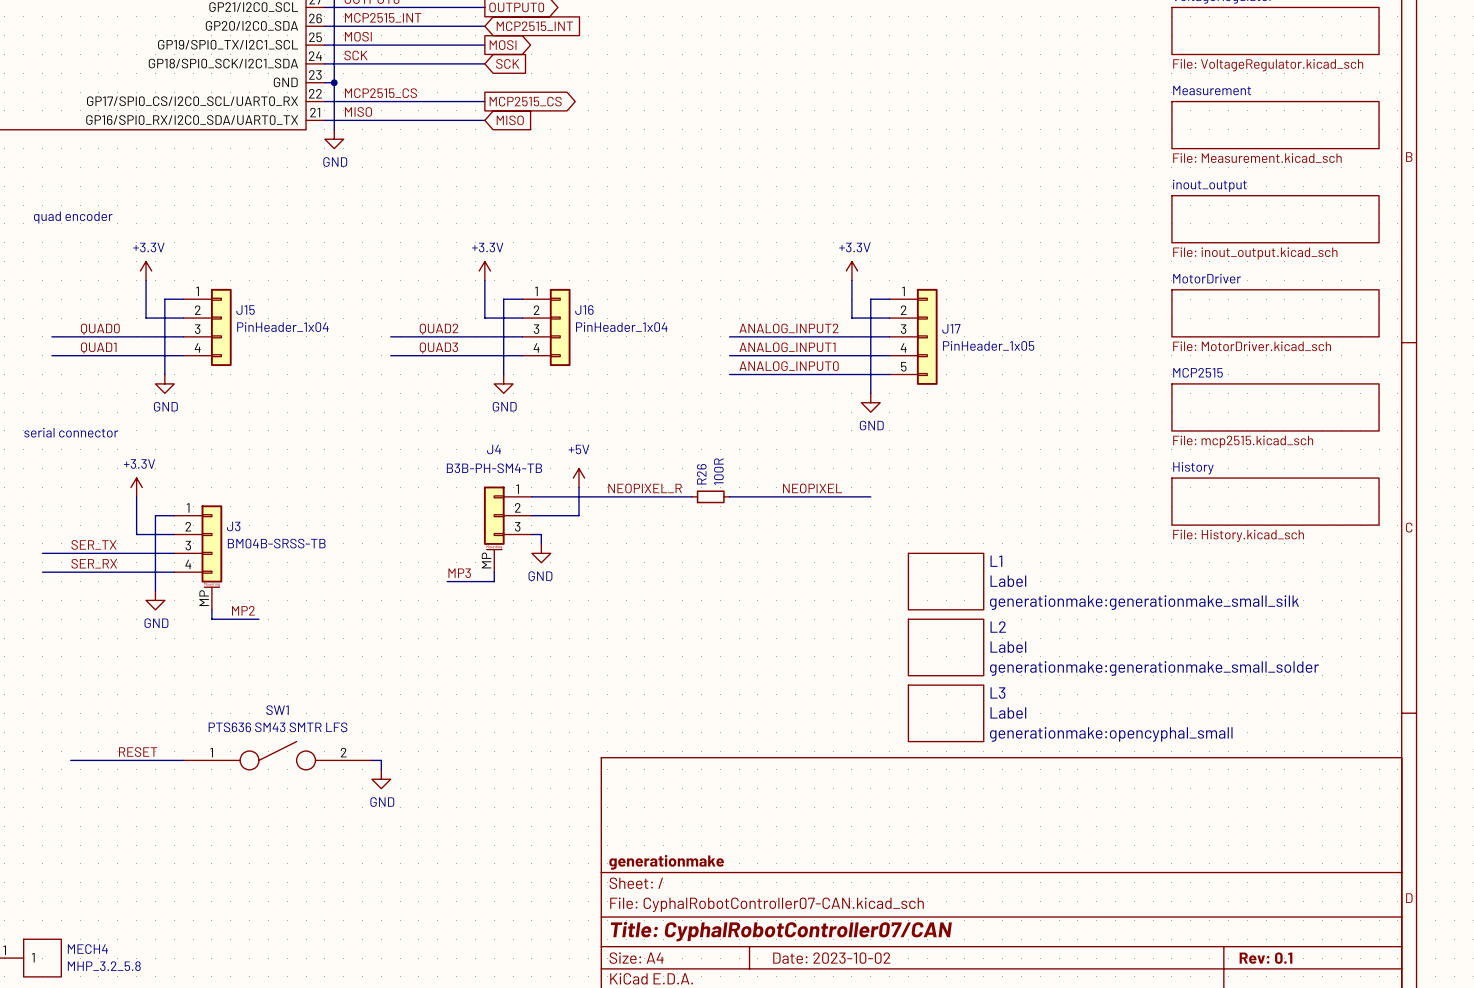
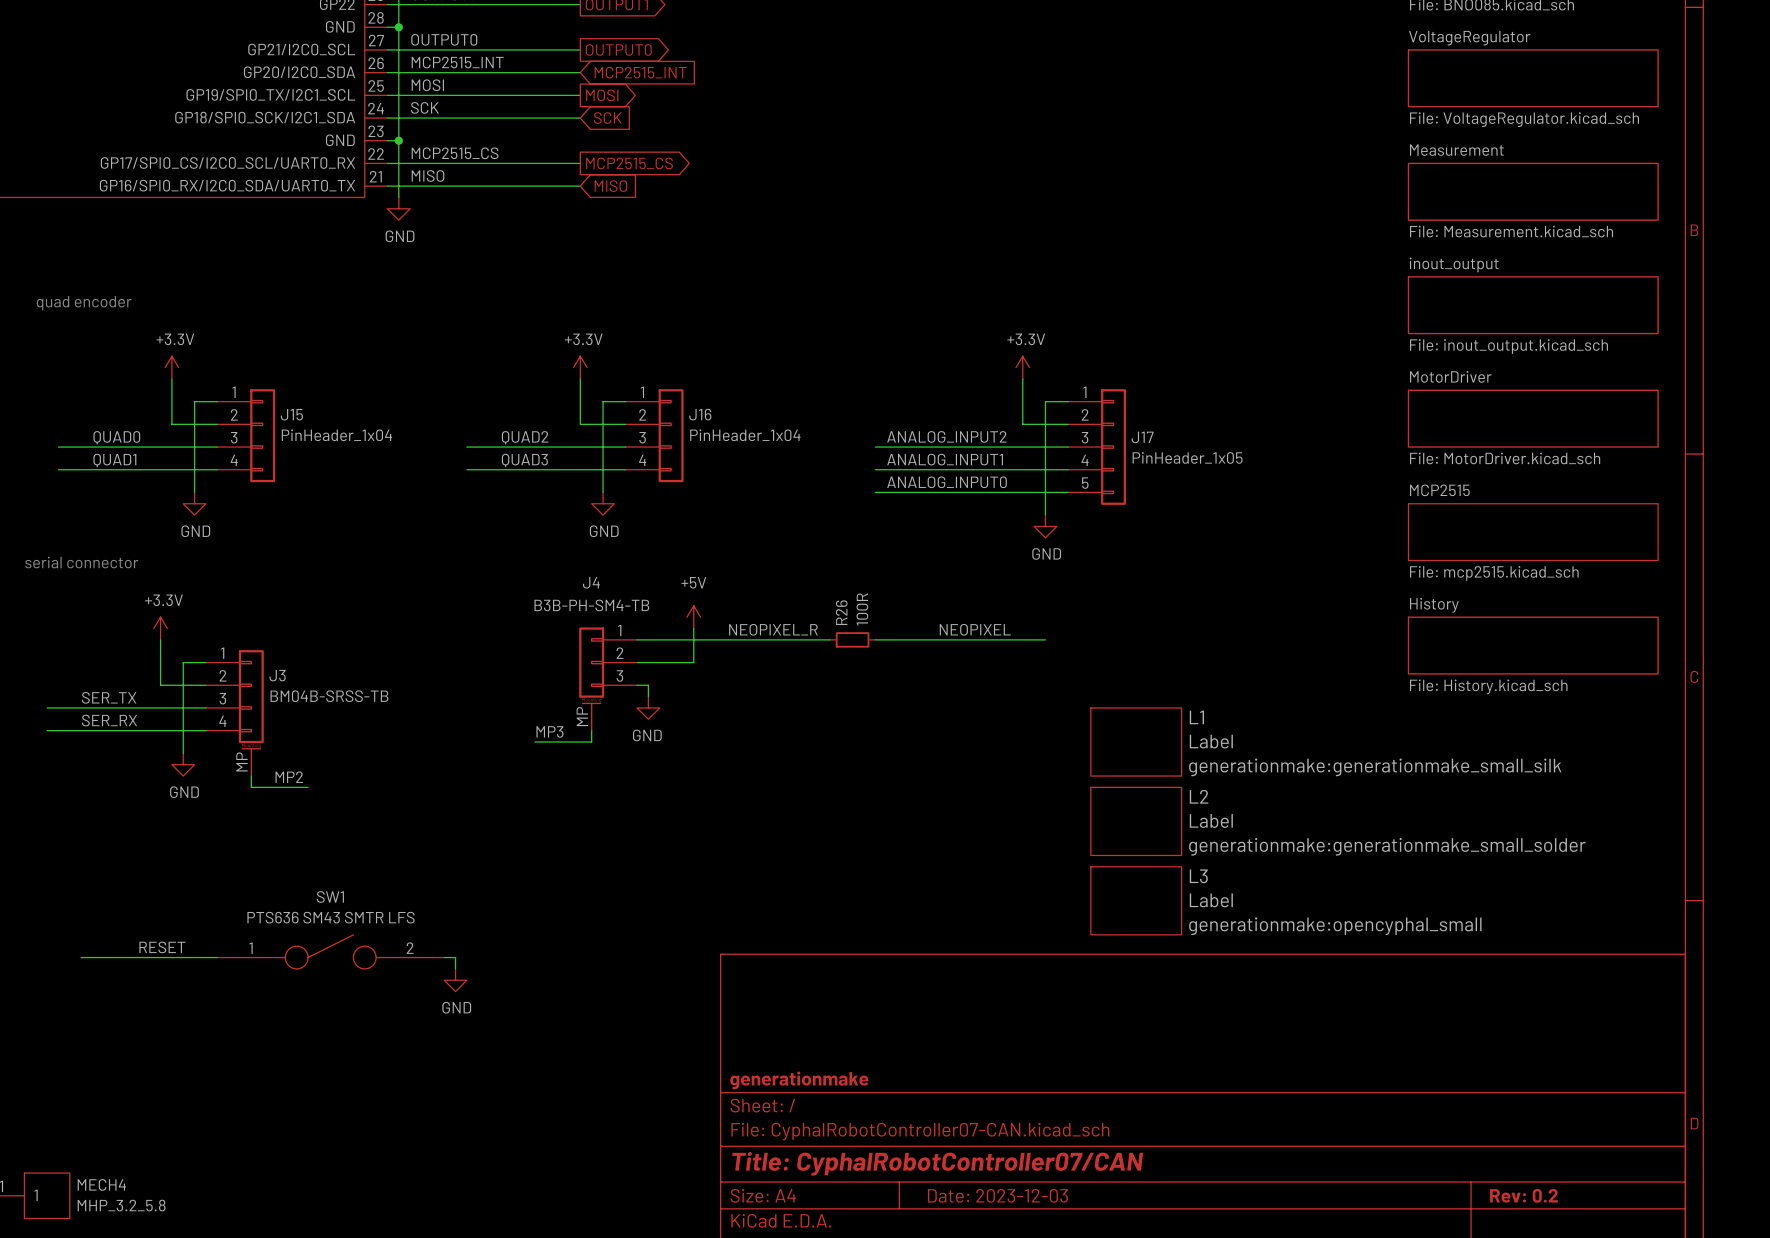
title block: Date: 2023-10-02 (831, 958) -> Date: 2023-12-03 (997, 1195)
title block: Rev: 0.1 (1266, 958) -> Rev: 0.2 (1523, 1195)

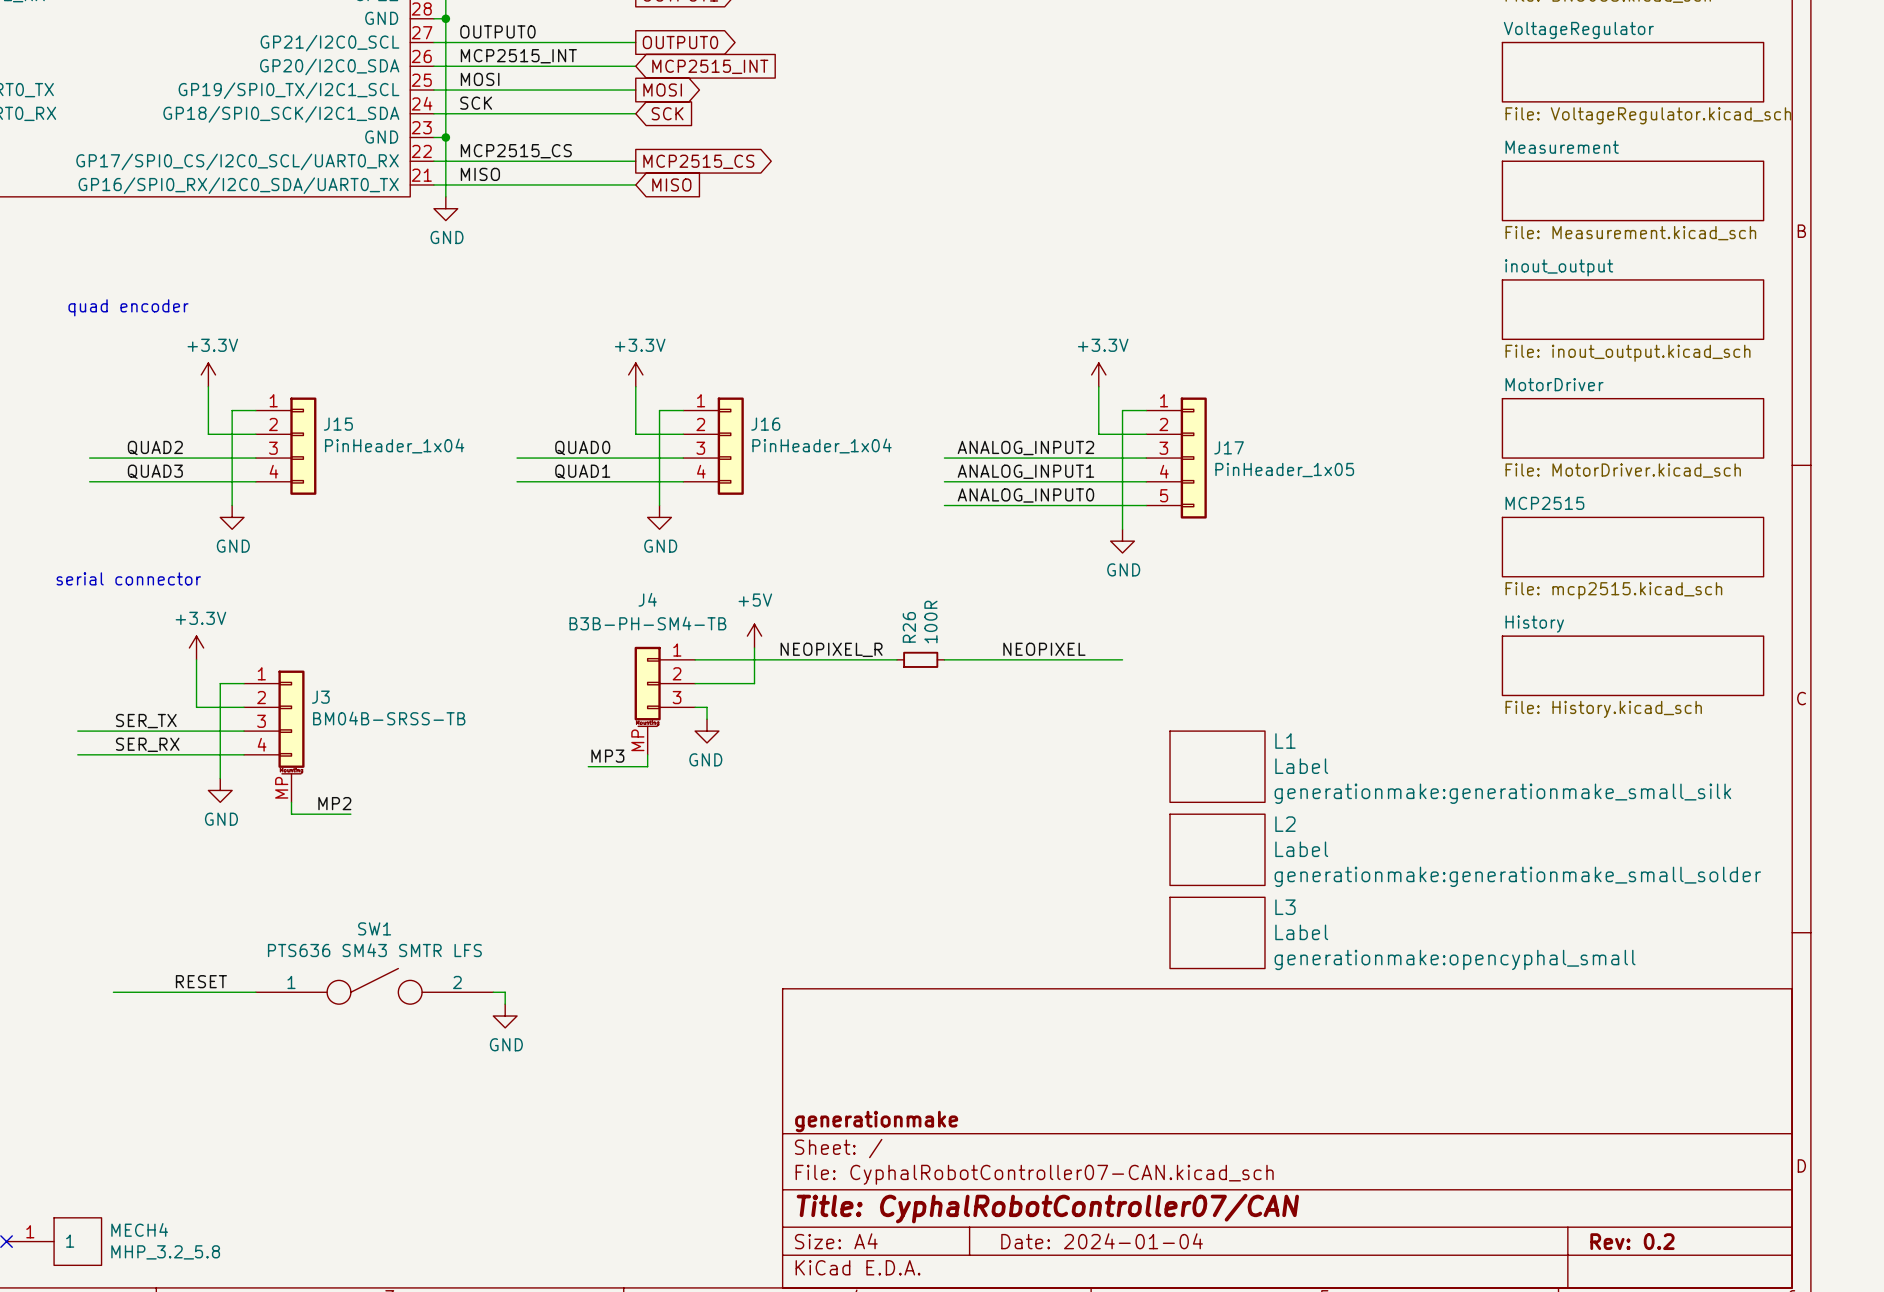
label: QUAD0 (116, 437) -> QUAD2 (155, 448)
label: QUAD2 (525, 437) -> QUAD0 (582, 448)
label: QUAD1 (114, 460) -> QUAD3 (155, 471)
label: QUAD3 (524, 460) -> QUAD1 (582, 471)
title block: Date: 2023-12-03 (997, 1195) -> Date: 2024-01-04 (1102, 1241)

